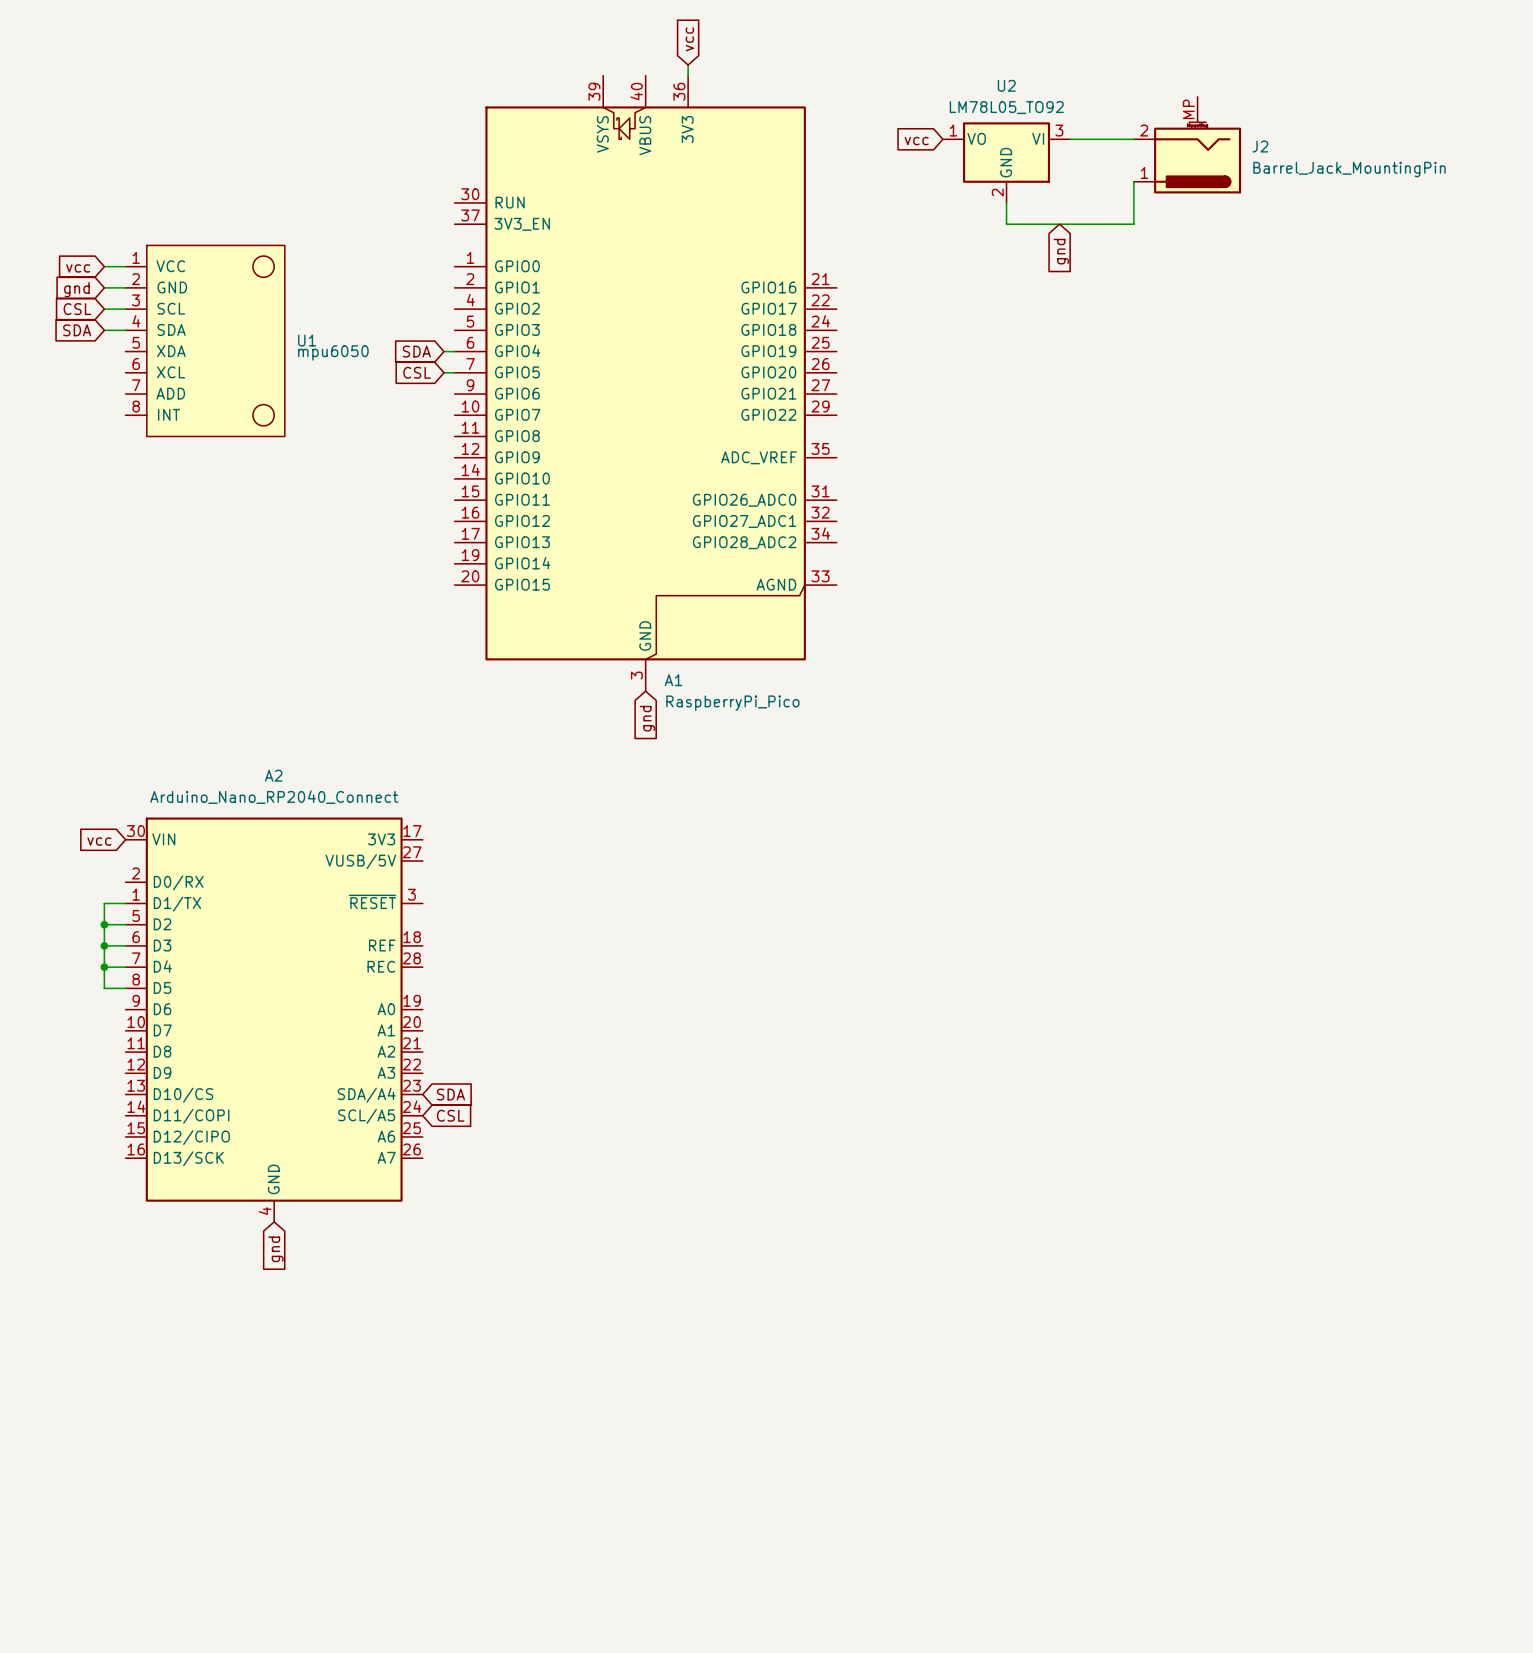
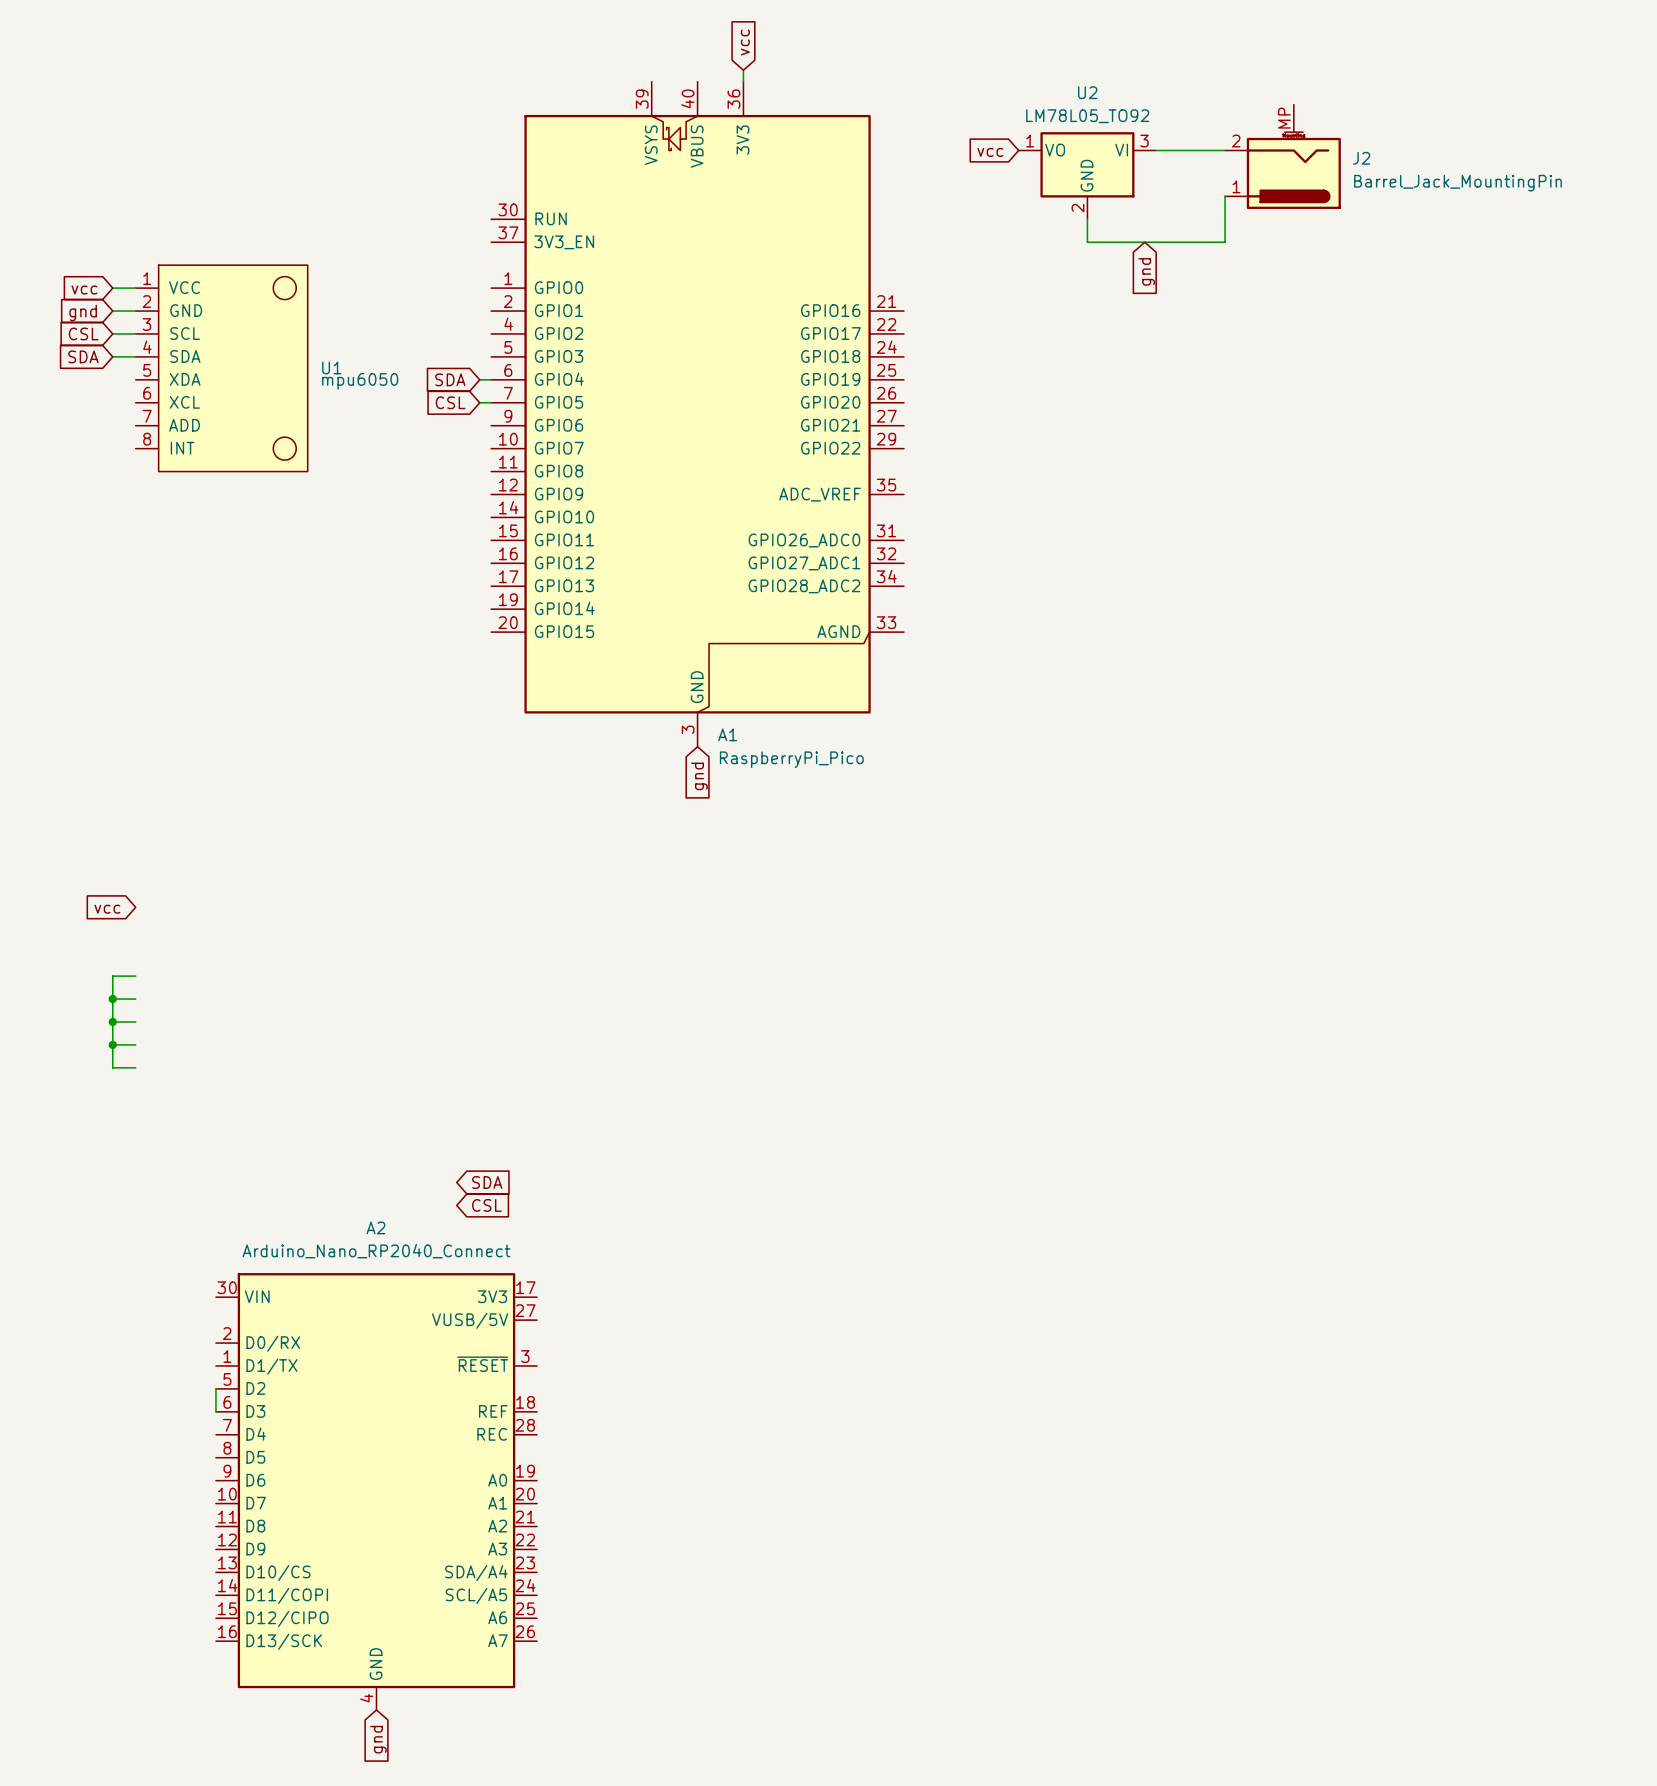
A2 position: (274, 1019) -> (376, 1491)
global label: gnd (275, 1249) -> none
wire: none -> (215, 1388) (215, 1411)
global label: none -> gnd (378, 1739)

